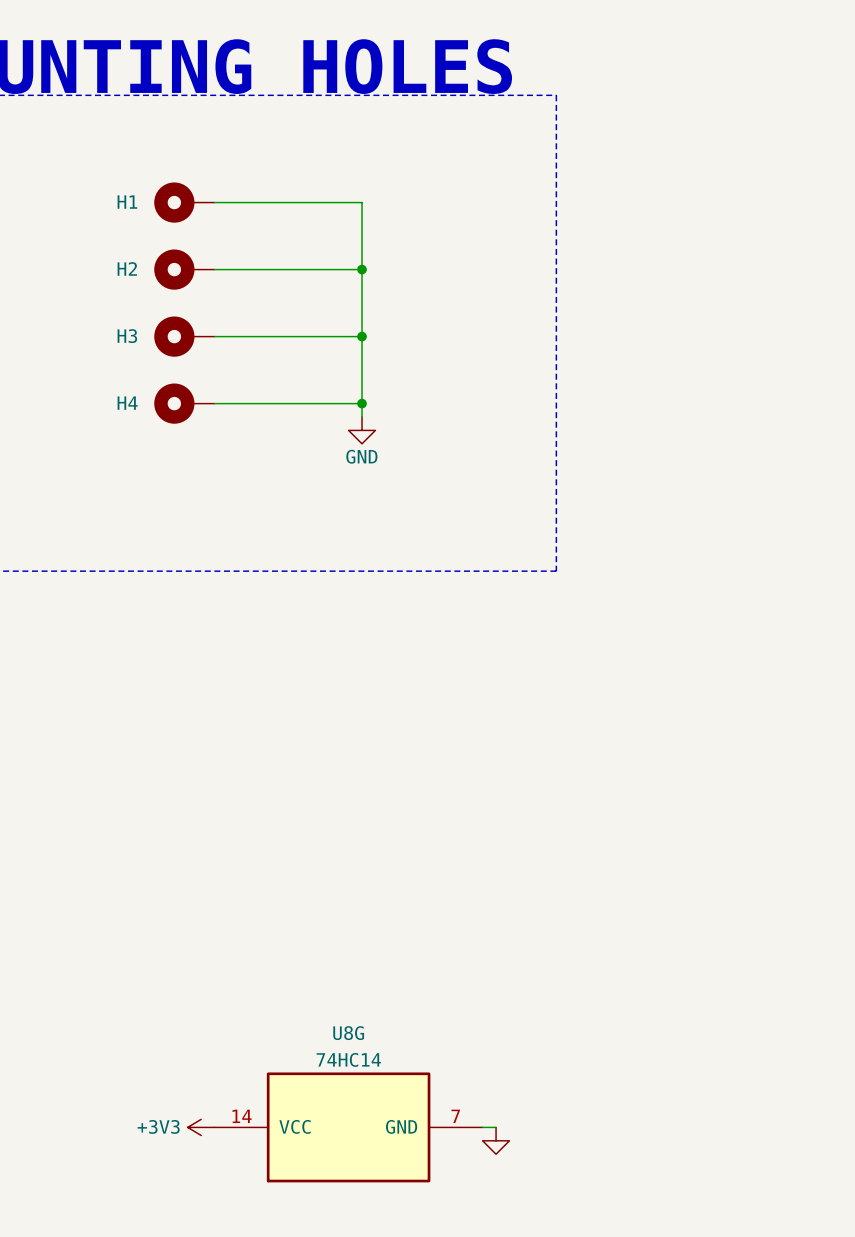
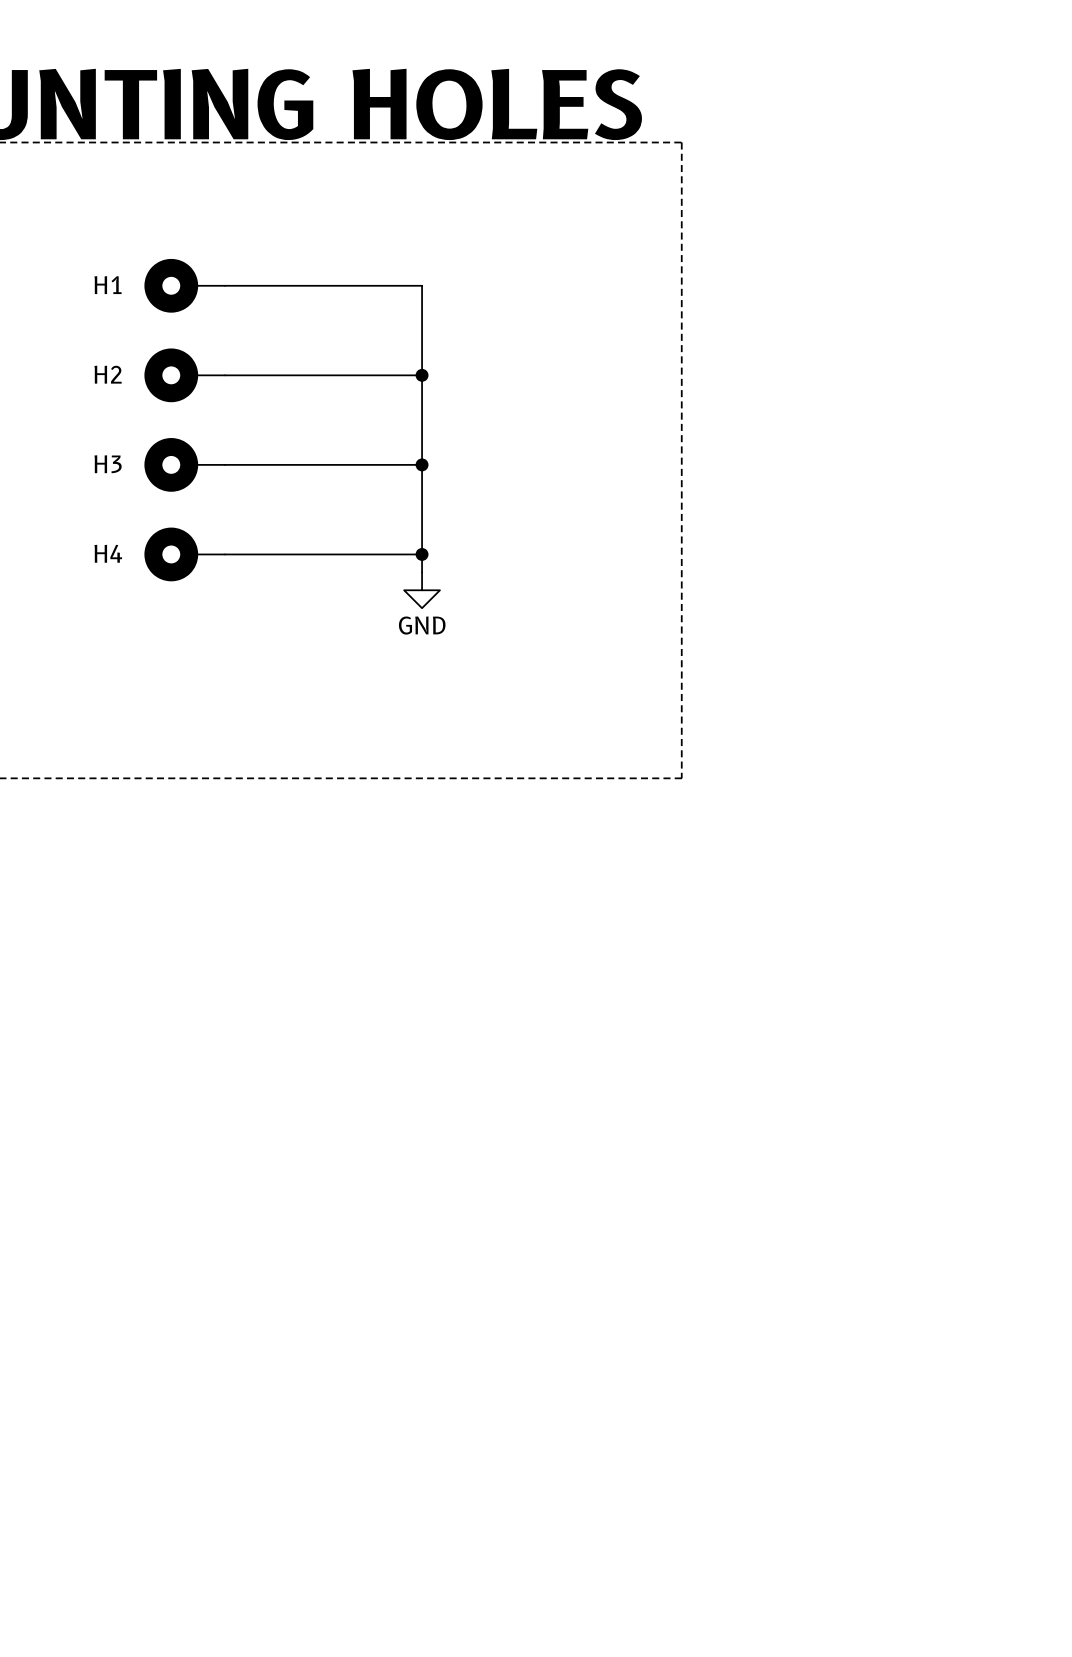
power symbol: +3V3 (201, 1127) -> none
U8G: 74HC14 (348, 1127) -> none
wire: (482, 1127) (496, 1127) -> none
power symbol: (496, 1140) -> none

